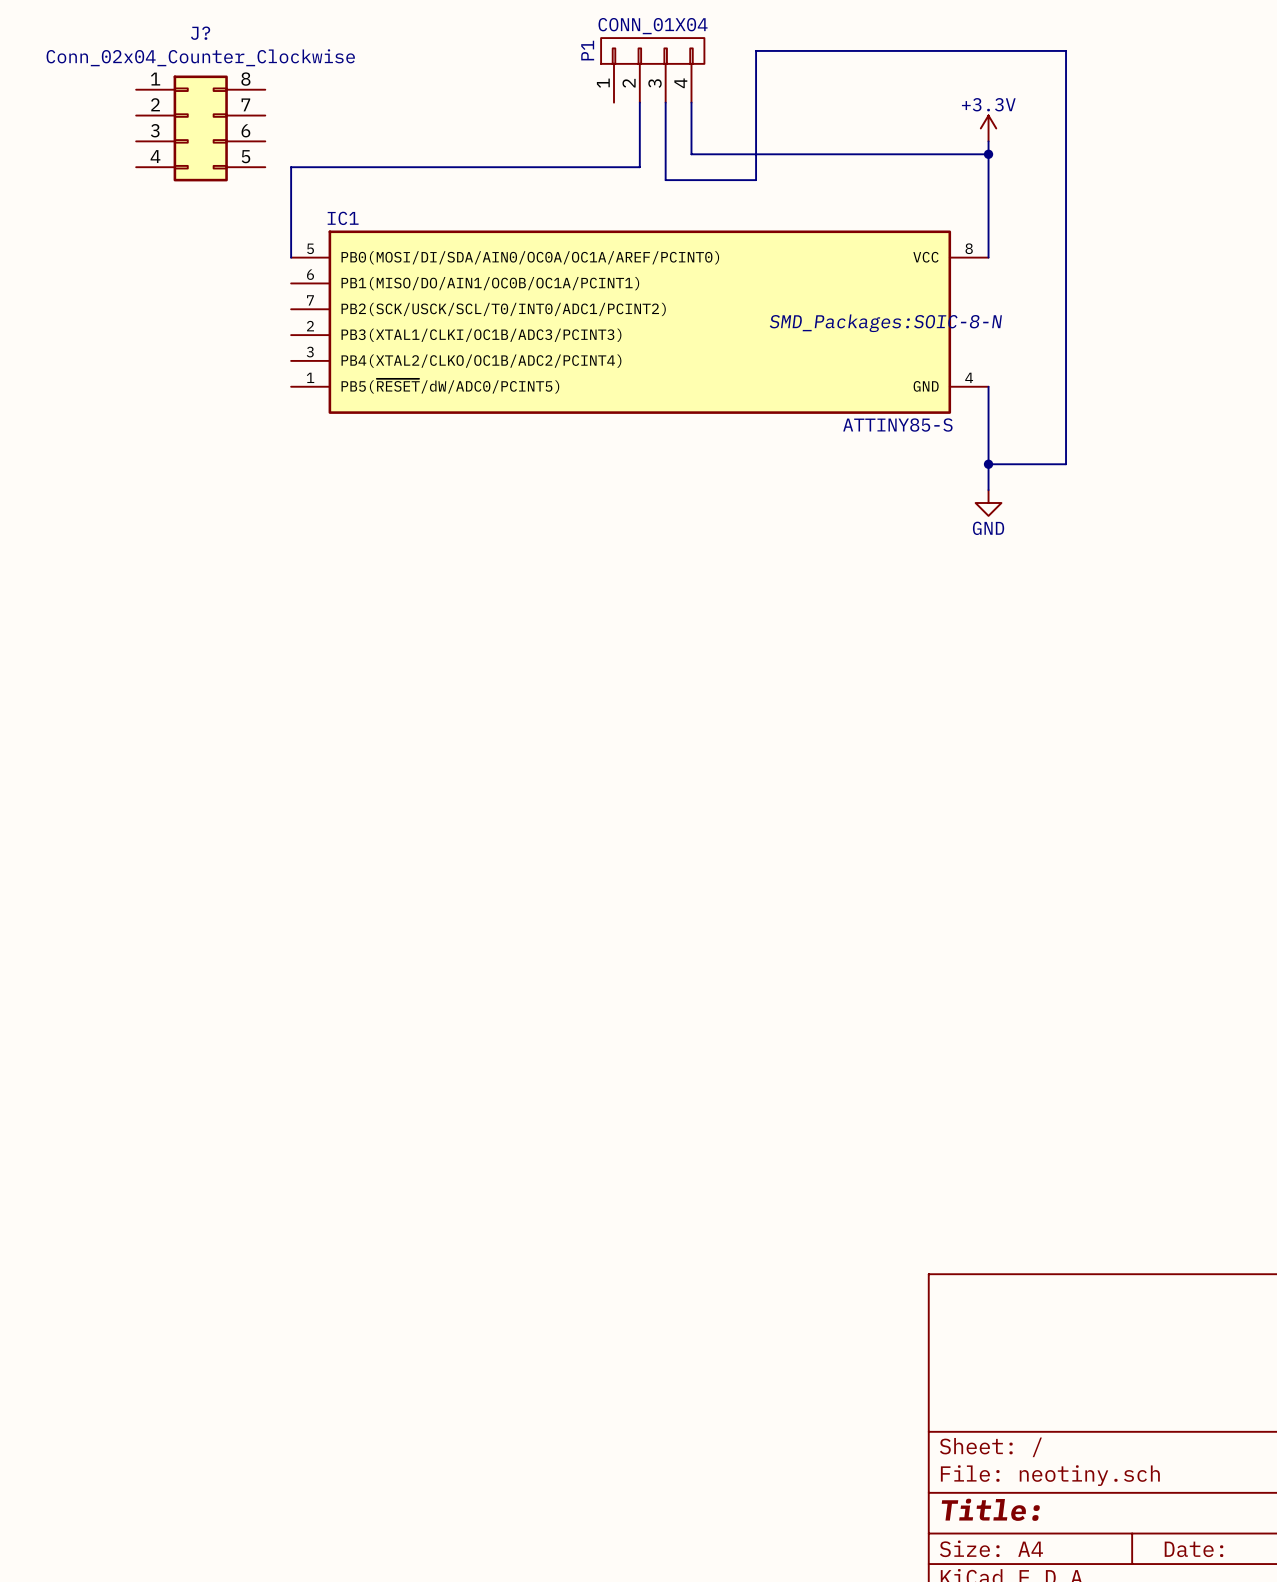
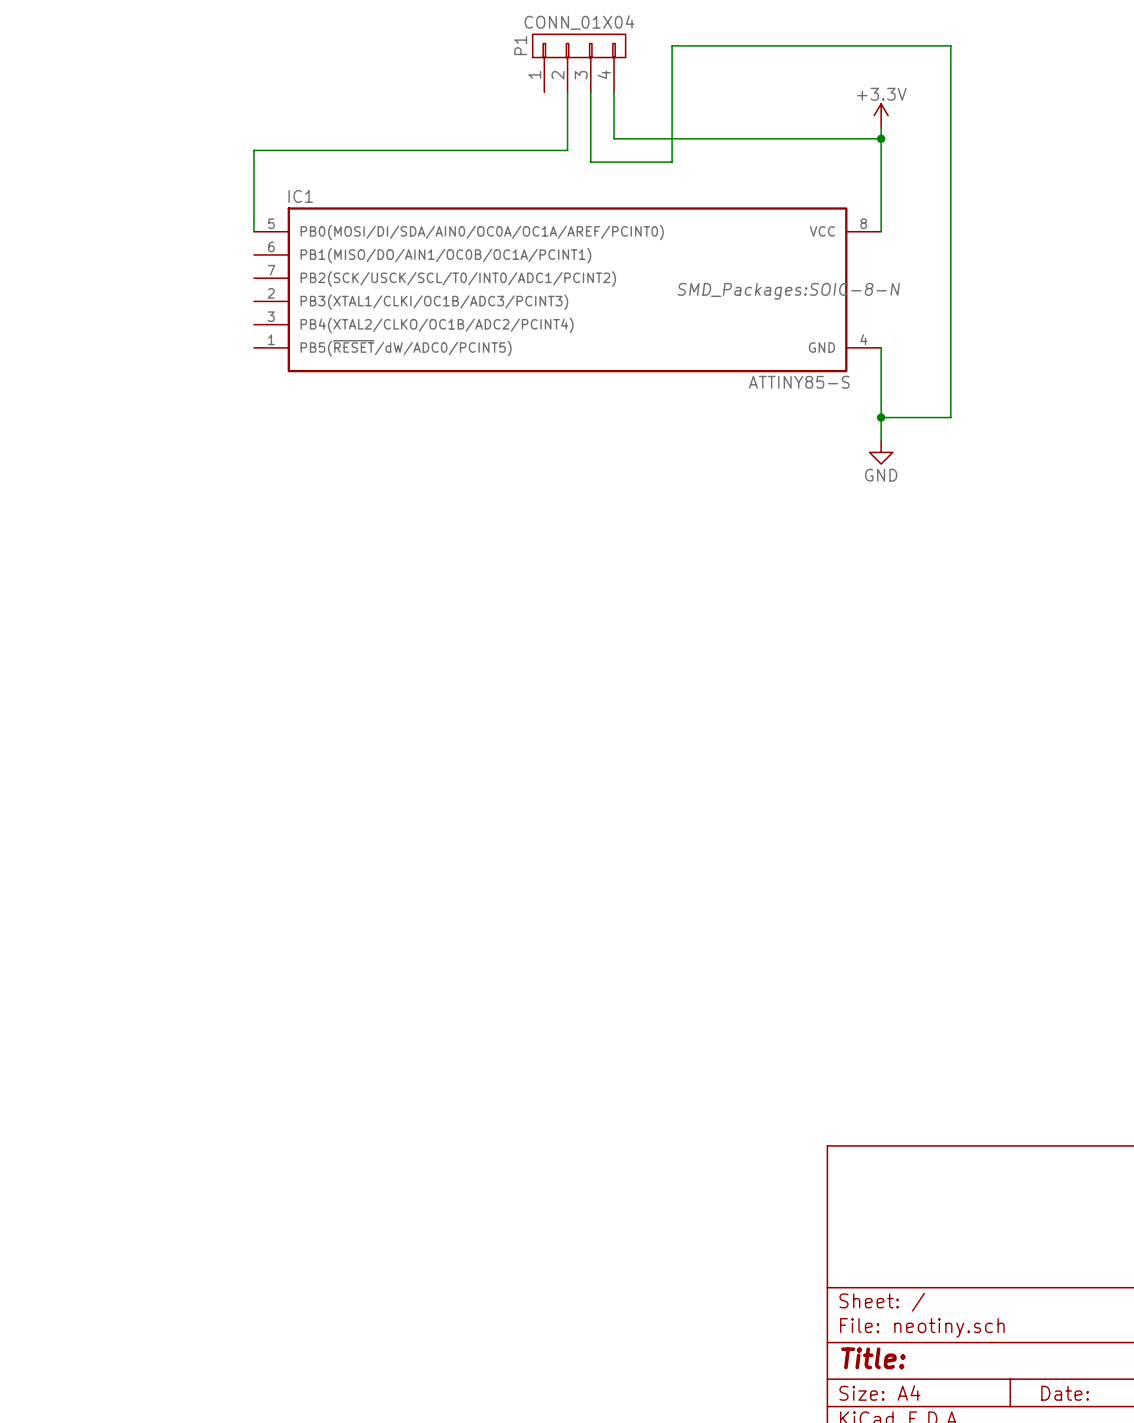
J?: Conn_02x04_Counter_Clockwise (200, 128) -> none

